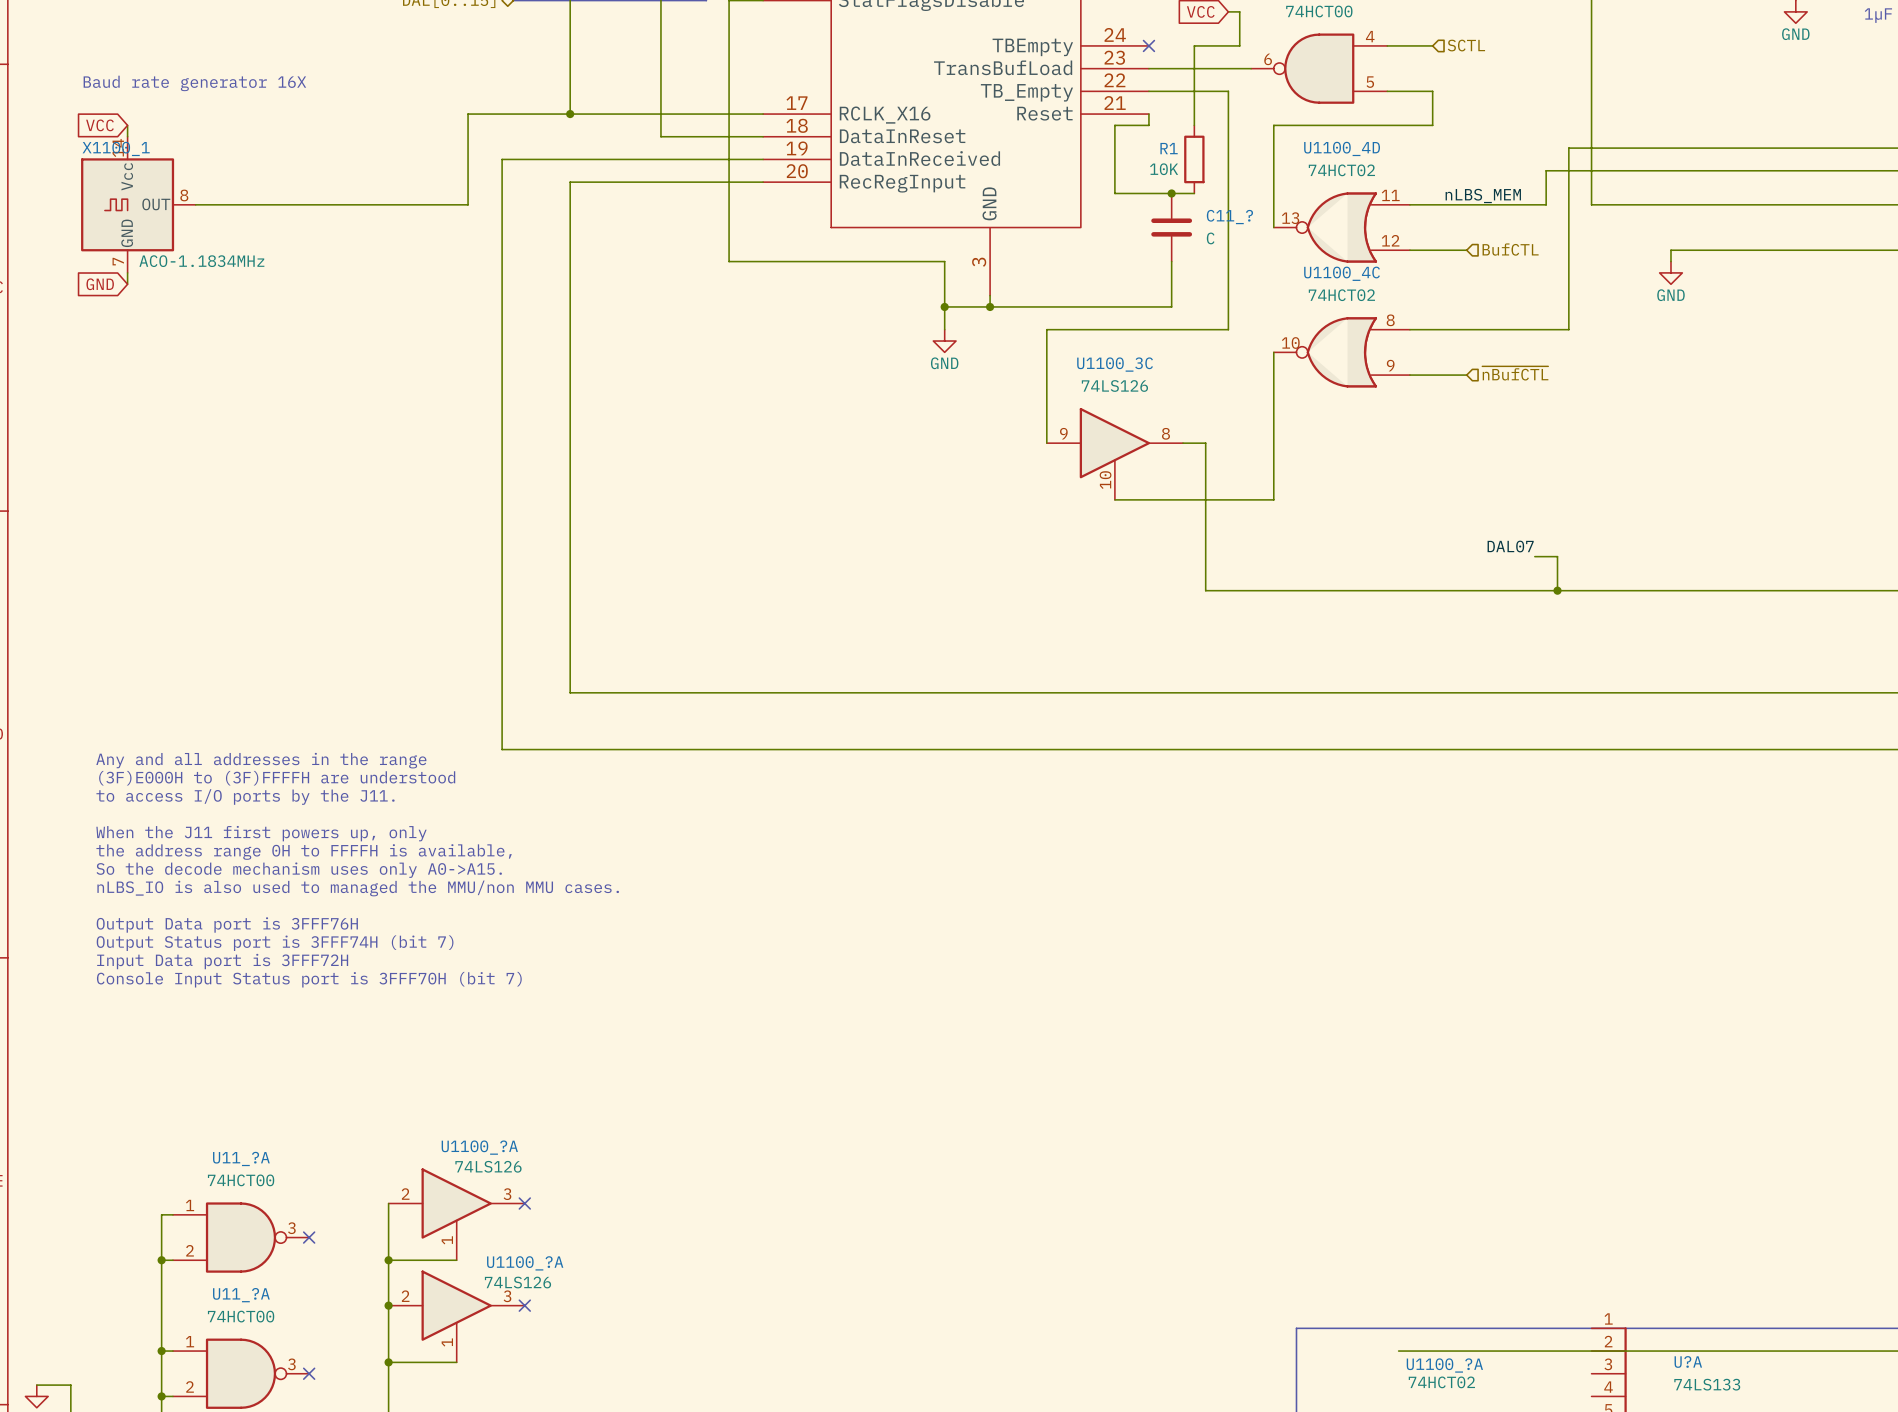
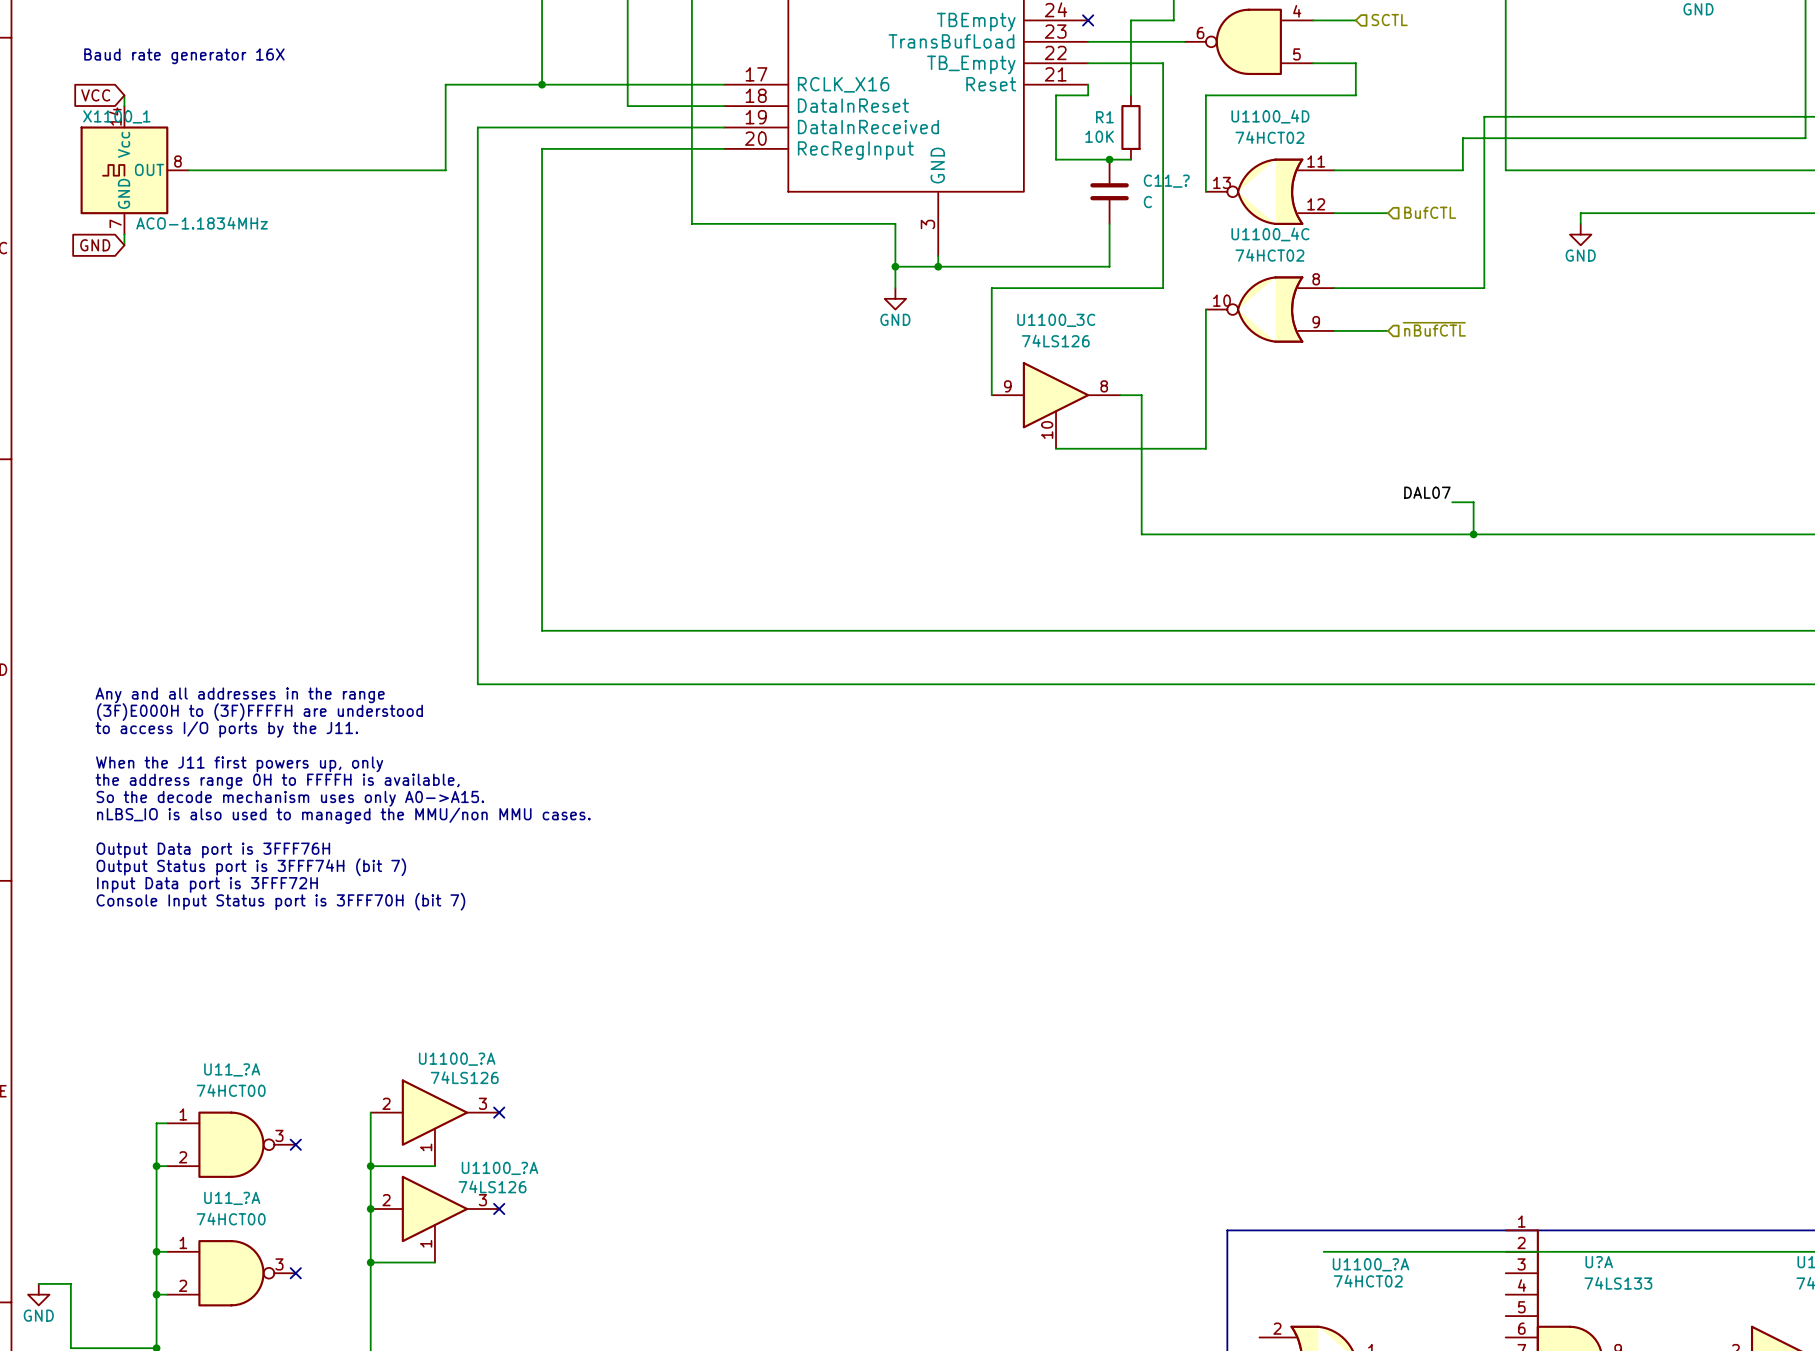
label: nLBS_MEM (1483, 195) -> none

